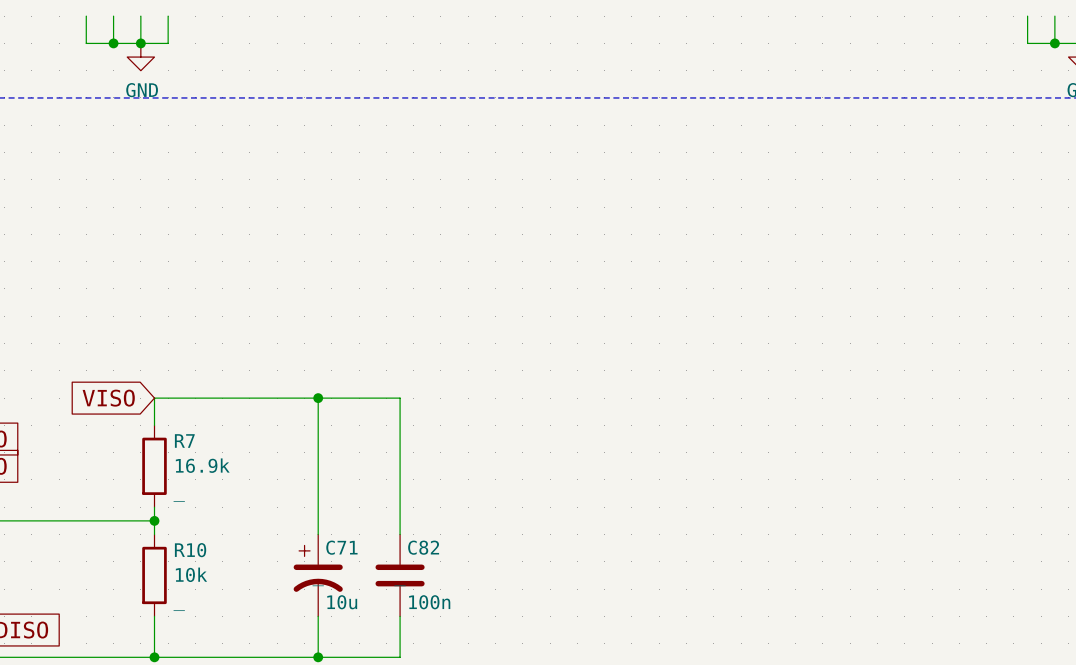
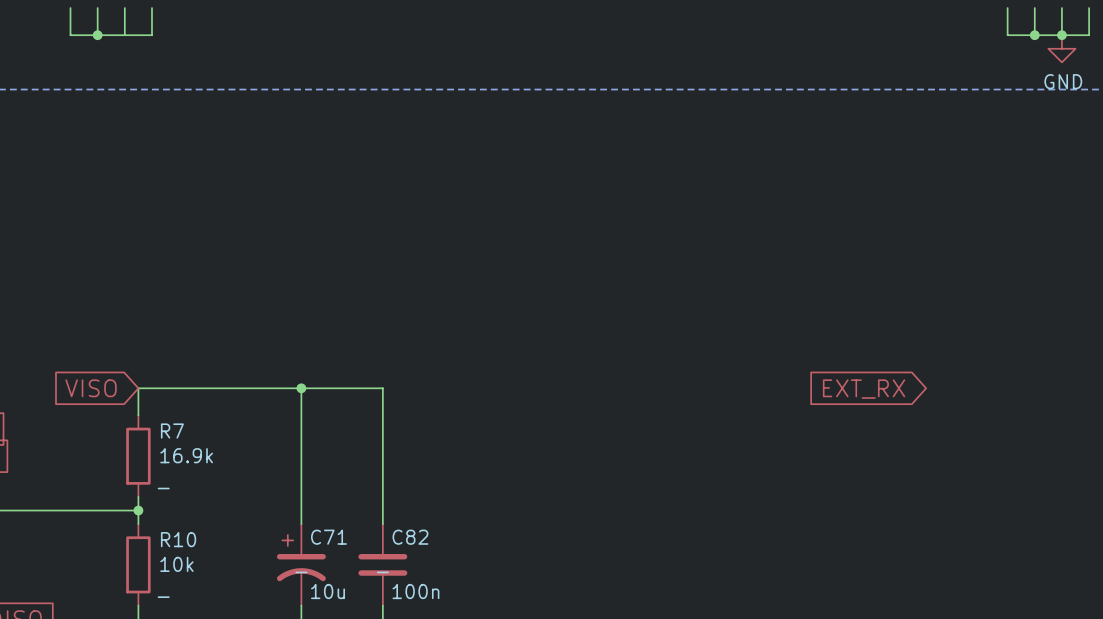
junction: (140, 43) -> none
power symbol: GND (140, 57) -> none
global label: none -> EXT_RX (864, 389)

